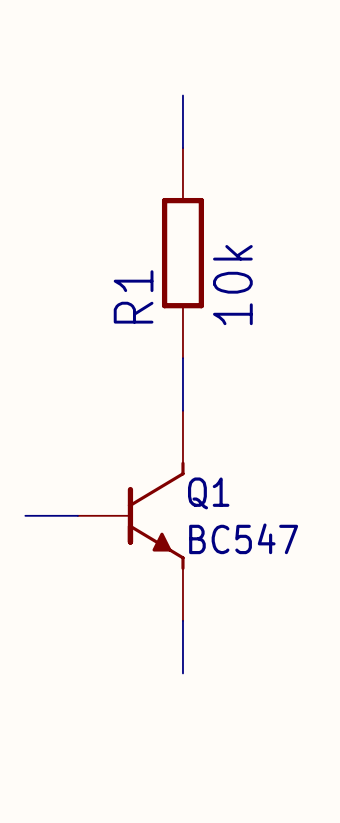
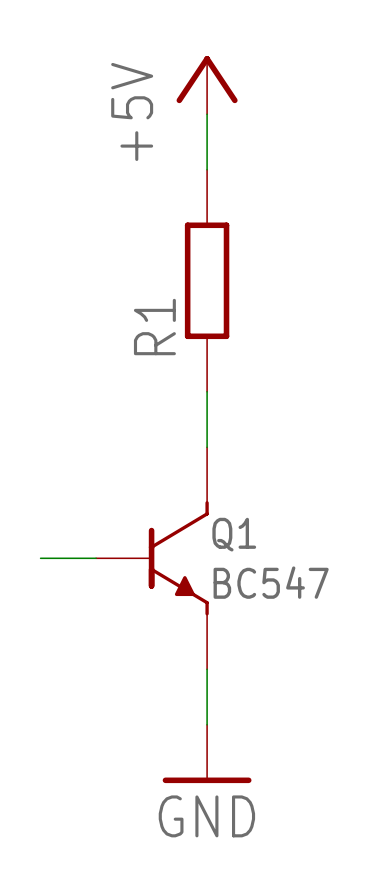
power symbol: none -> +5V (207, 85)
R1 value: 10k (232, 285) -> none
power symbol: none -> GND (207, 753)

